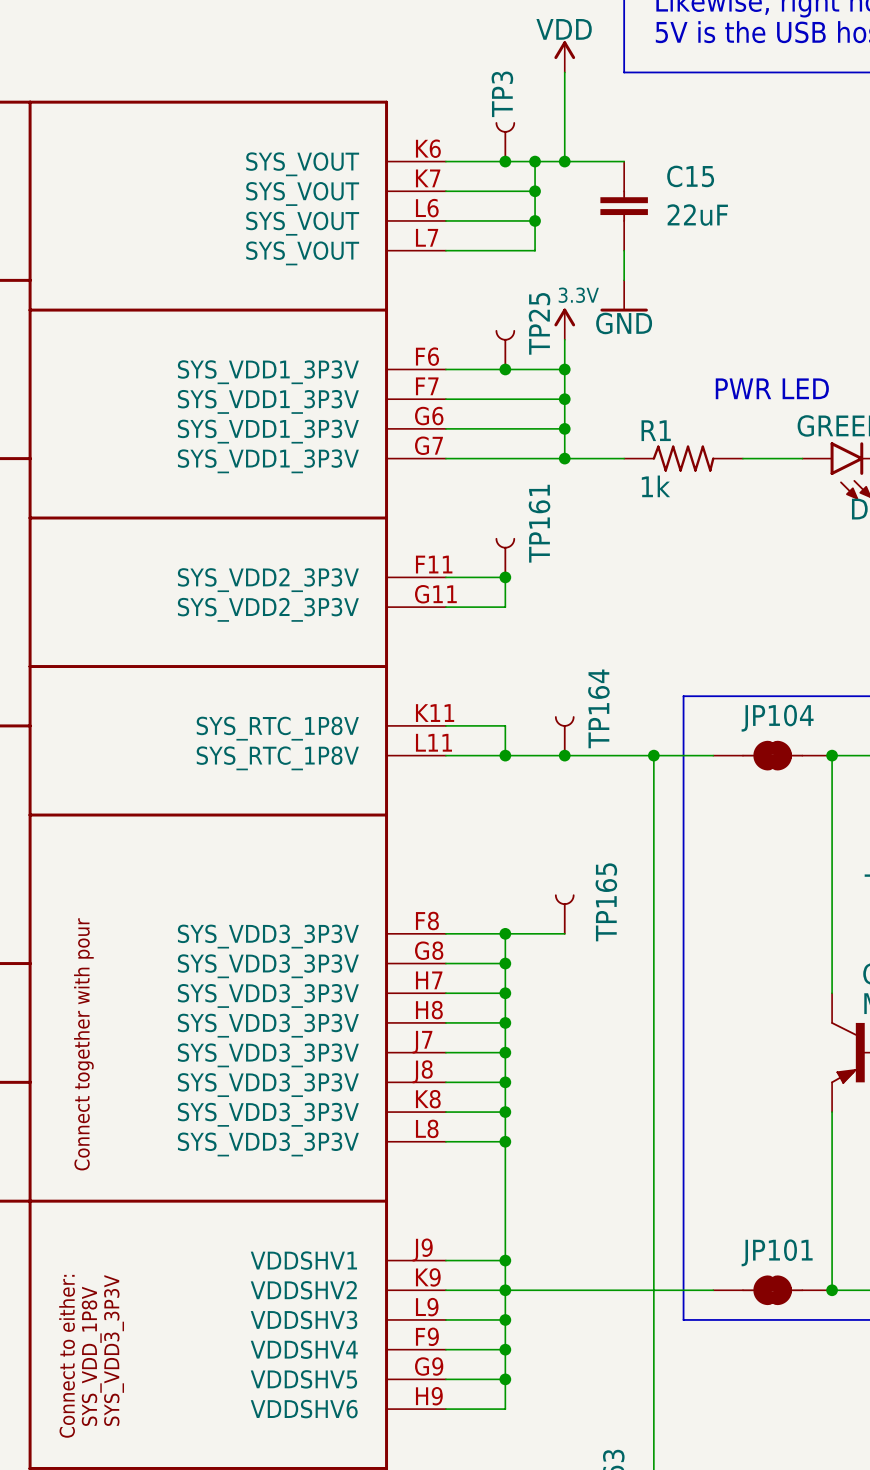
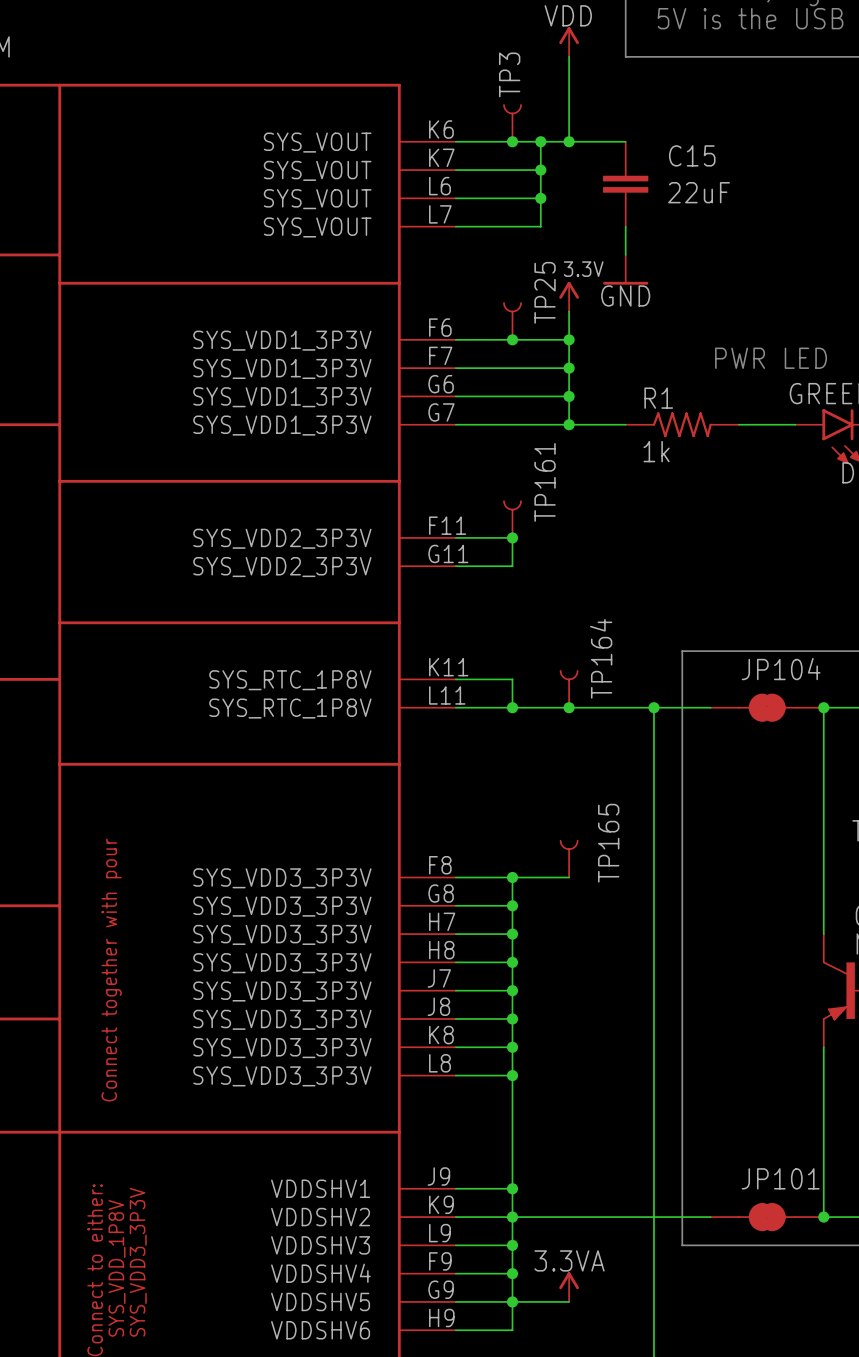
power symbol: none -> 3.3VA (569, 1287)
wire: none -> (512, 1301) (569, 1301)

